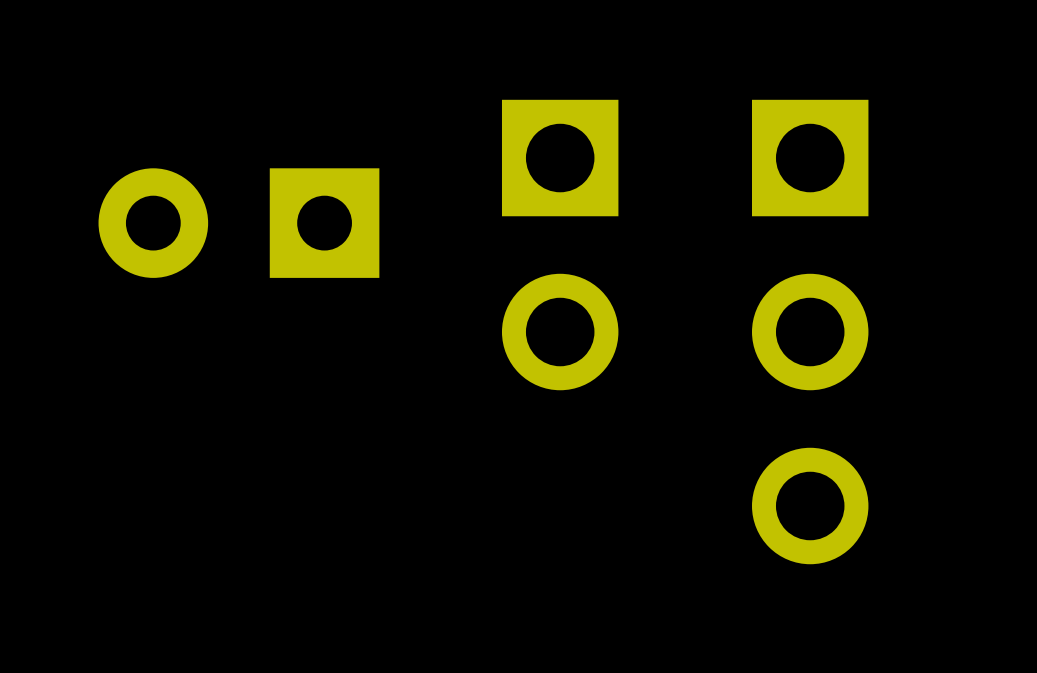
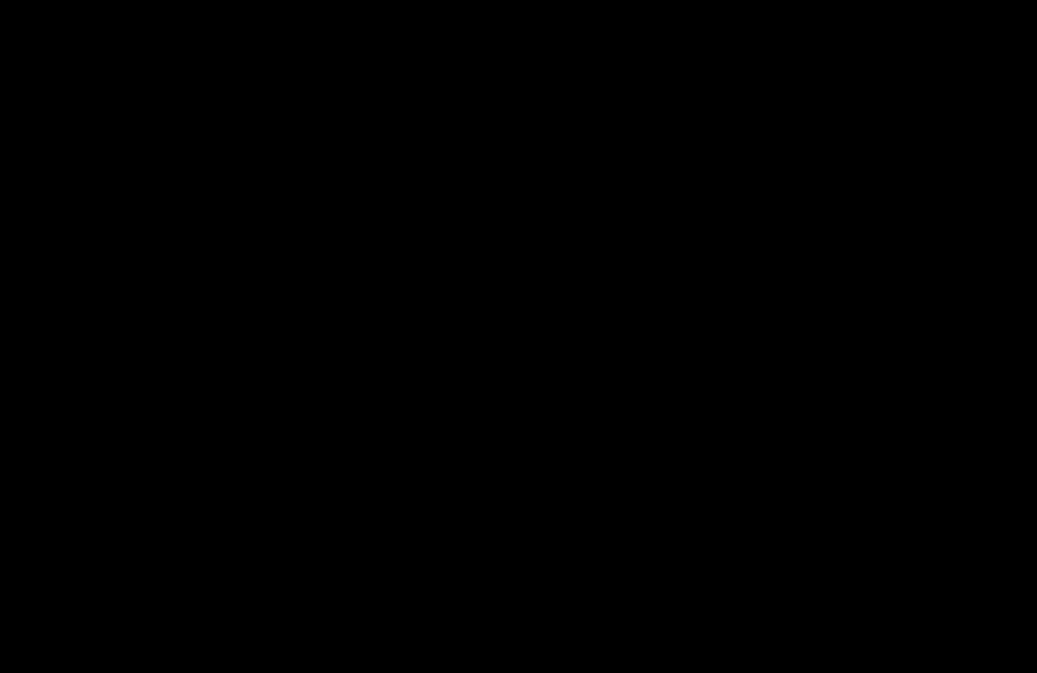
part: (238, 223) -> none
part: (560, 245) -> none
part: (810, 332) -> none

